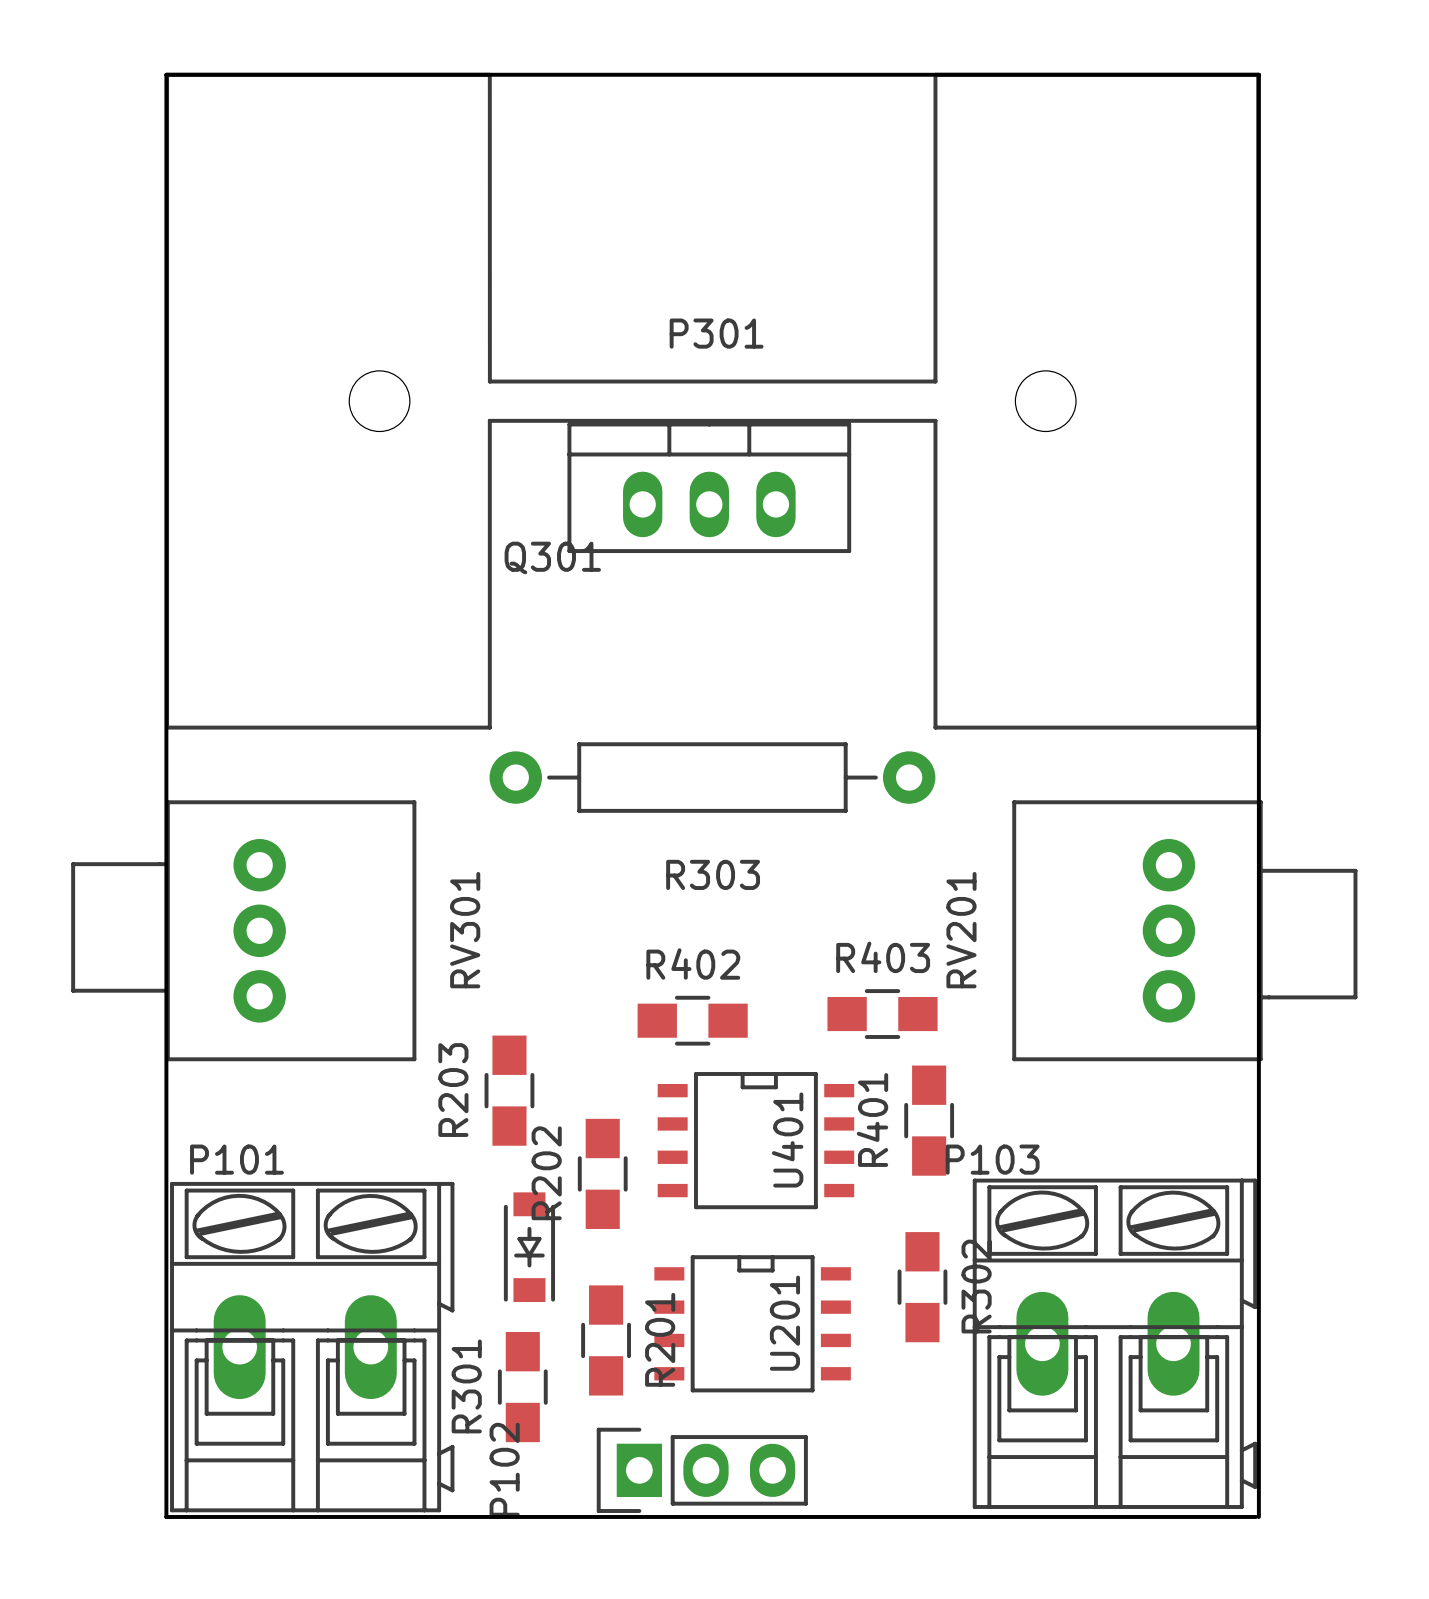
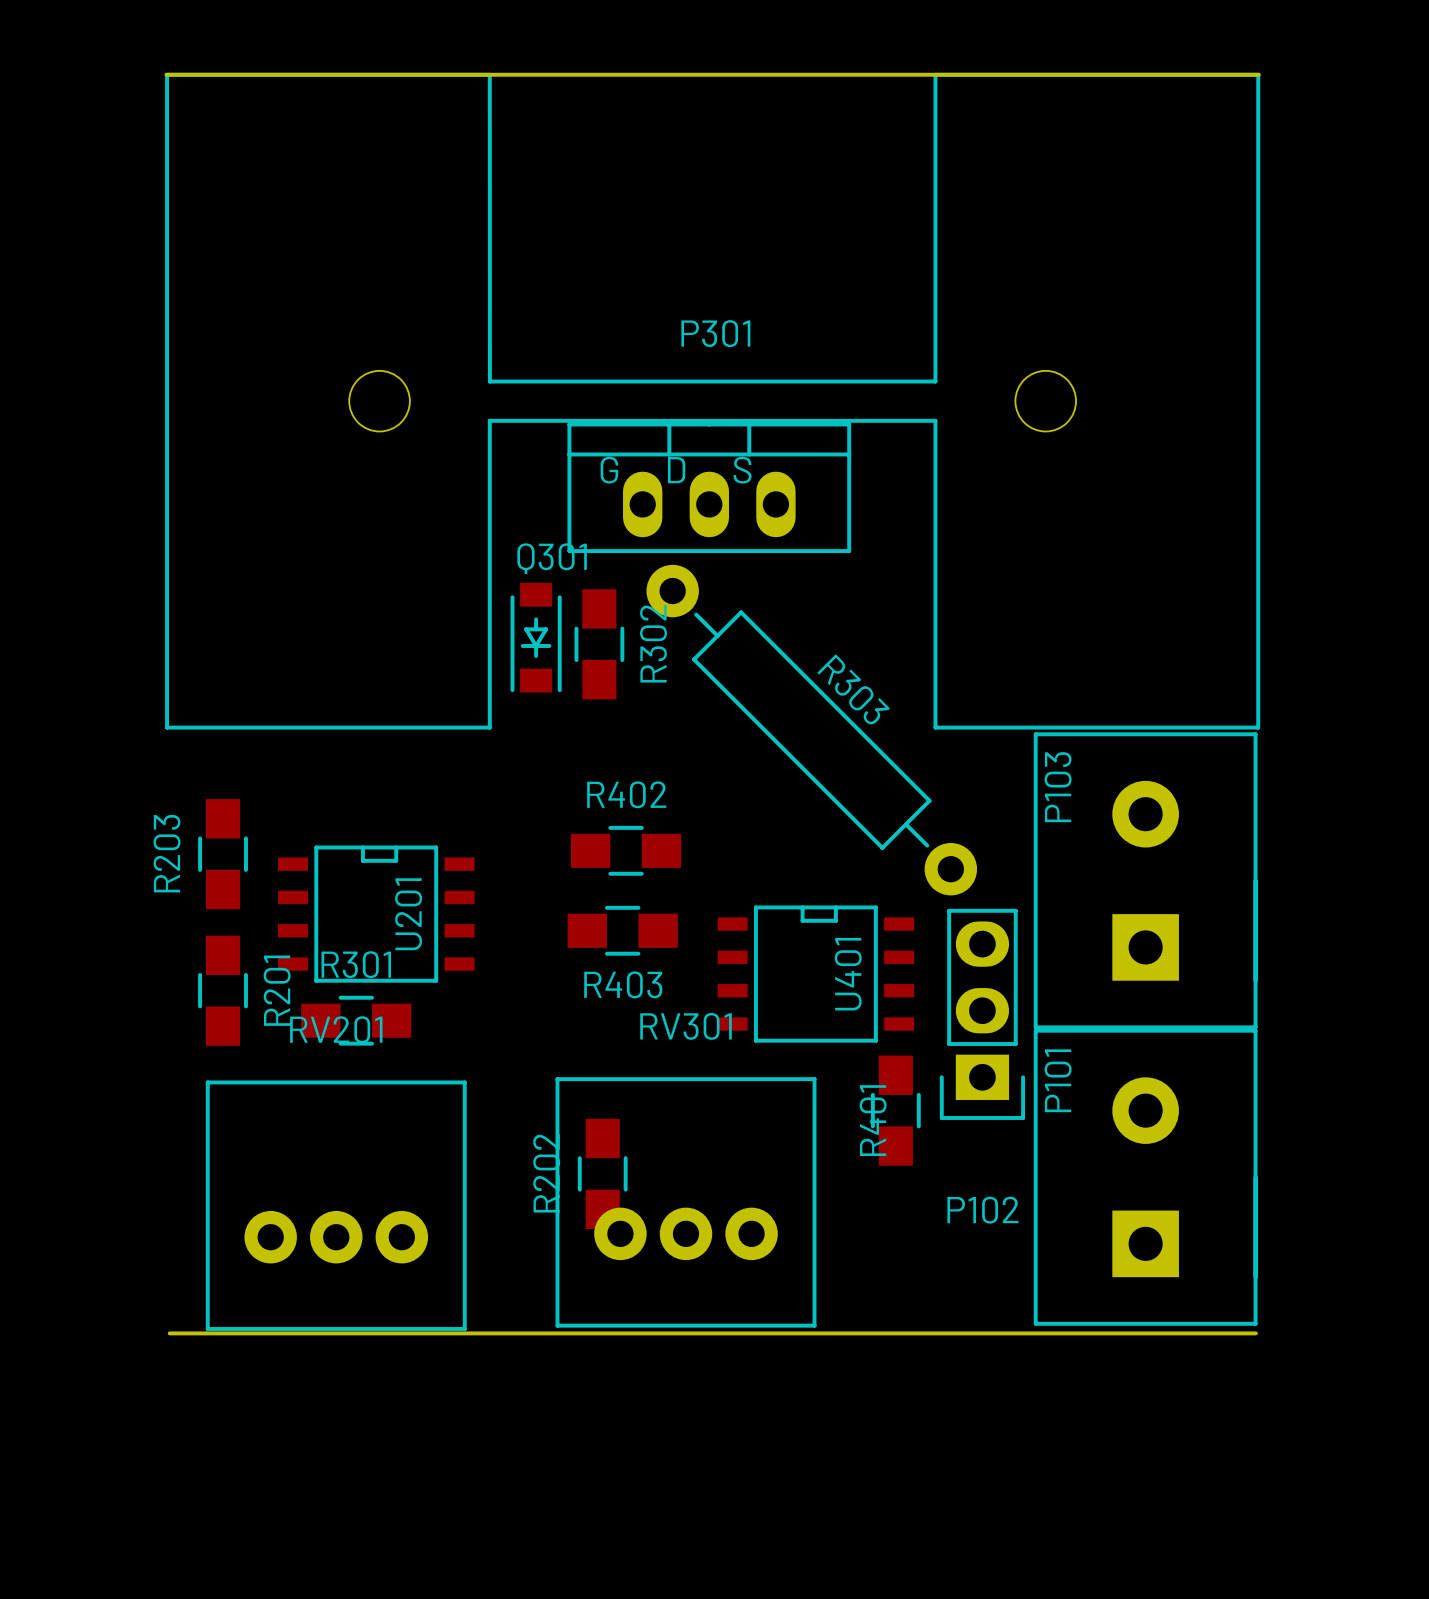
board edge: (166, 74) (166, 1516) (1255, 1516) -> none
board edge: (1258, 74) (1258, 1516) -> none
Q301 text: none -> G (609, 470)
Q301 text: none -> D (676, 470)
Q301 text: none -> S (742, 470)
RV301 footprint: [71, 770, 417, 1091] -> [526, 1077, 846, 1328]
RV201 footprint: [1012, 770, 1358, 1091] -> [176, 1080, 497, 1331]
R303 rotation: 0° (712, 777) -> 45° clockwise (811, 730)
R303 name position: R303 (713, 874) -> R303 (853, 689)
RV301 name position: RV301 (465, 930) -> RV301 (686, 1026)
RV201 name position: RV201 (961, 930) -> RV201 (336, 1029)
R403 name position: R403 (883, 957) -> R403 (623, 984)
R403 position: (882, 1014) -> (622, 930)
R402 position: (692, 1020) -> (626, 850)
R203 position: (509, 1090) -> (223, 854)
R401 position: (929, 1120) -> (895, 1110)
U401 position: (755, 1140) -> (815, 974)
P101 name position: P101 (236, 1159) -> P101 (1058, 1080)
P103 name position: P103 (992, 1159) -> P103 (1058, 787)
P103 footprint: [972, 1178, 1258, 1509] -> [1033, 732, 1258, 1030]
P101 footprint: [170, 1181, 455, 1513] -> [1033, 1028, 1258, 1326]
part position: (529, 1247) -> (536, 637)
R302 position: (922, 1287) -> (599, 644)
U201 position: (752, 1323) -> (376, 914)
board edge: none -> (169, 1333) (1255, 1333)
R201 position: (606, 1340) -> (223, 990)
R301 rotation: 0° (522, 1387) -> 90° clockwise (356, 1020)
R301 position: (522, 1387) -> (356, 1020)
P102 rotation: 0° (702, 1470) -> 90° counterclockwise (982, 1014)
P102 position: (702, 1470) -> (982, 1014)

